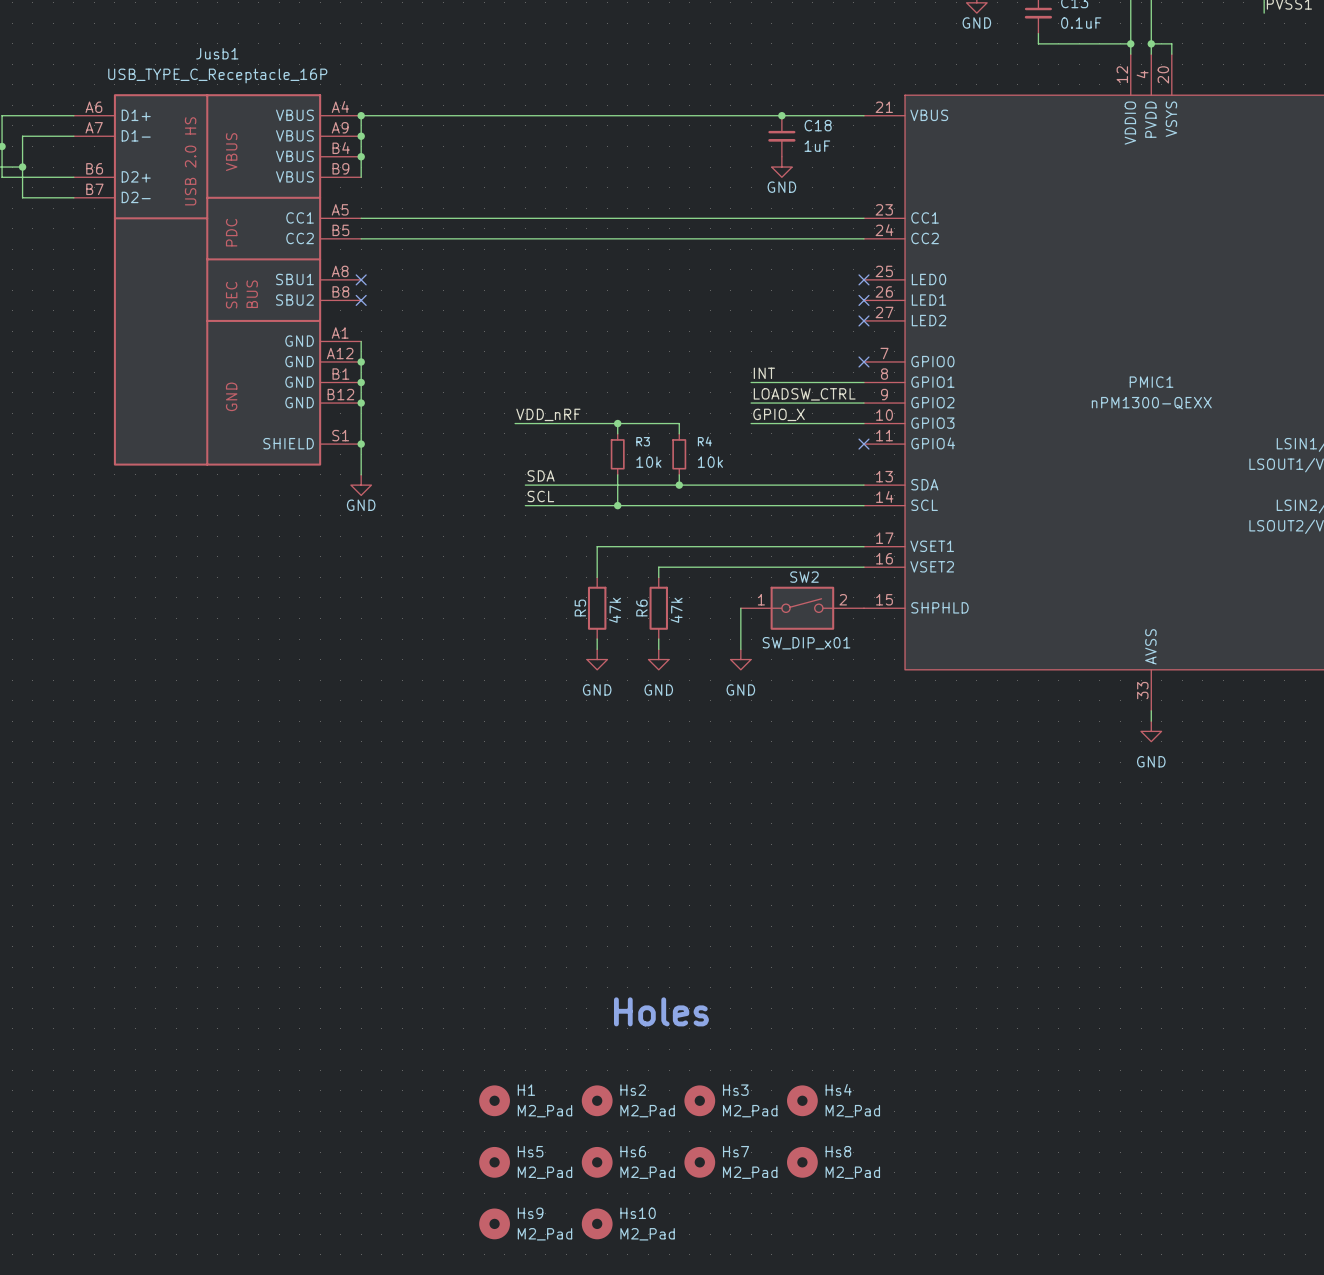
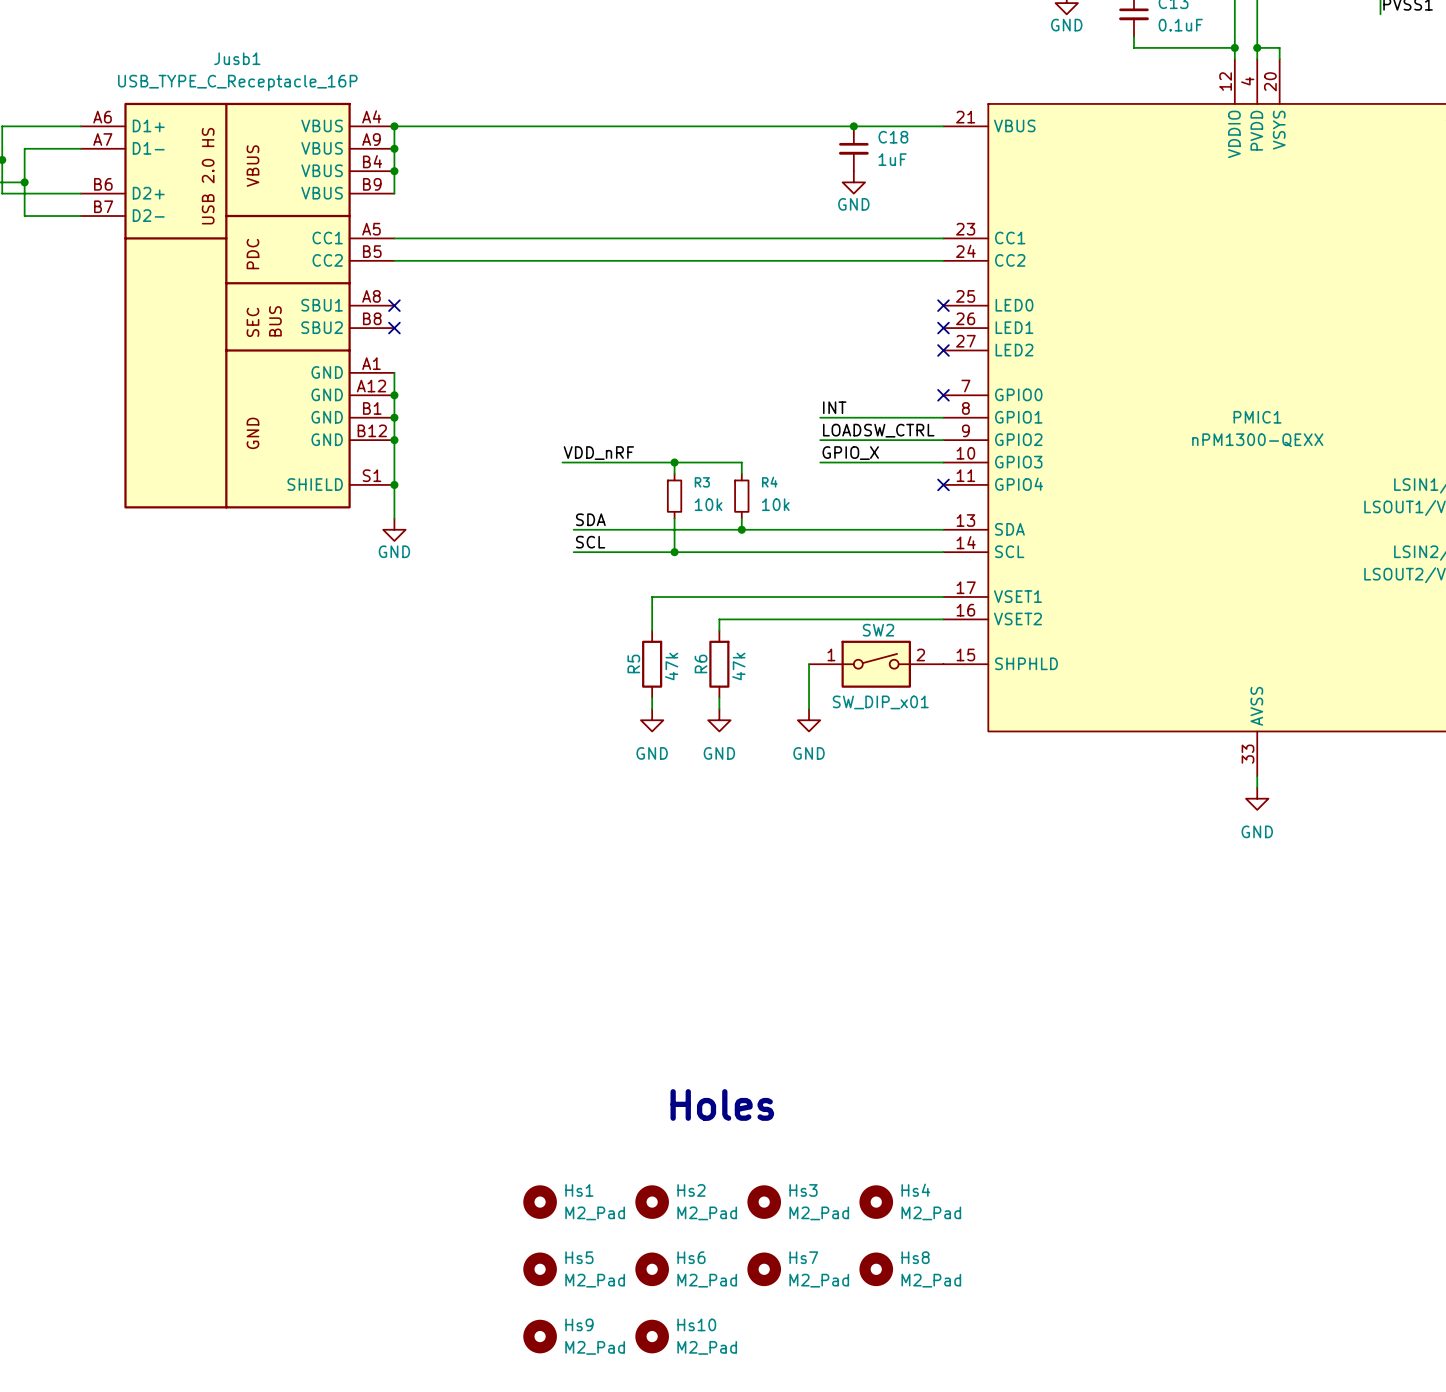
H1 name: H1 (526, 1090) -> Hs1 (579, 1190)

